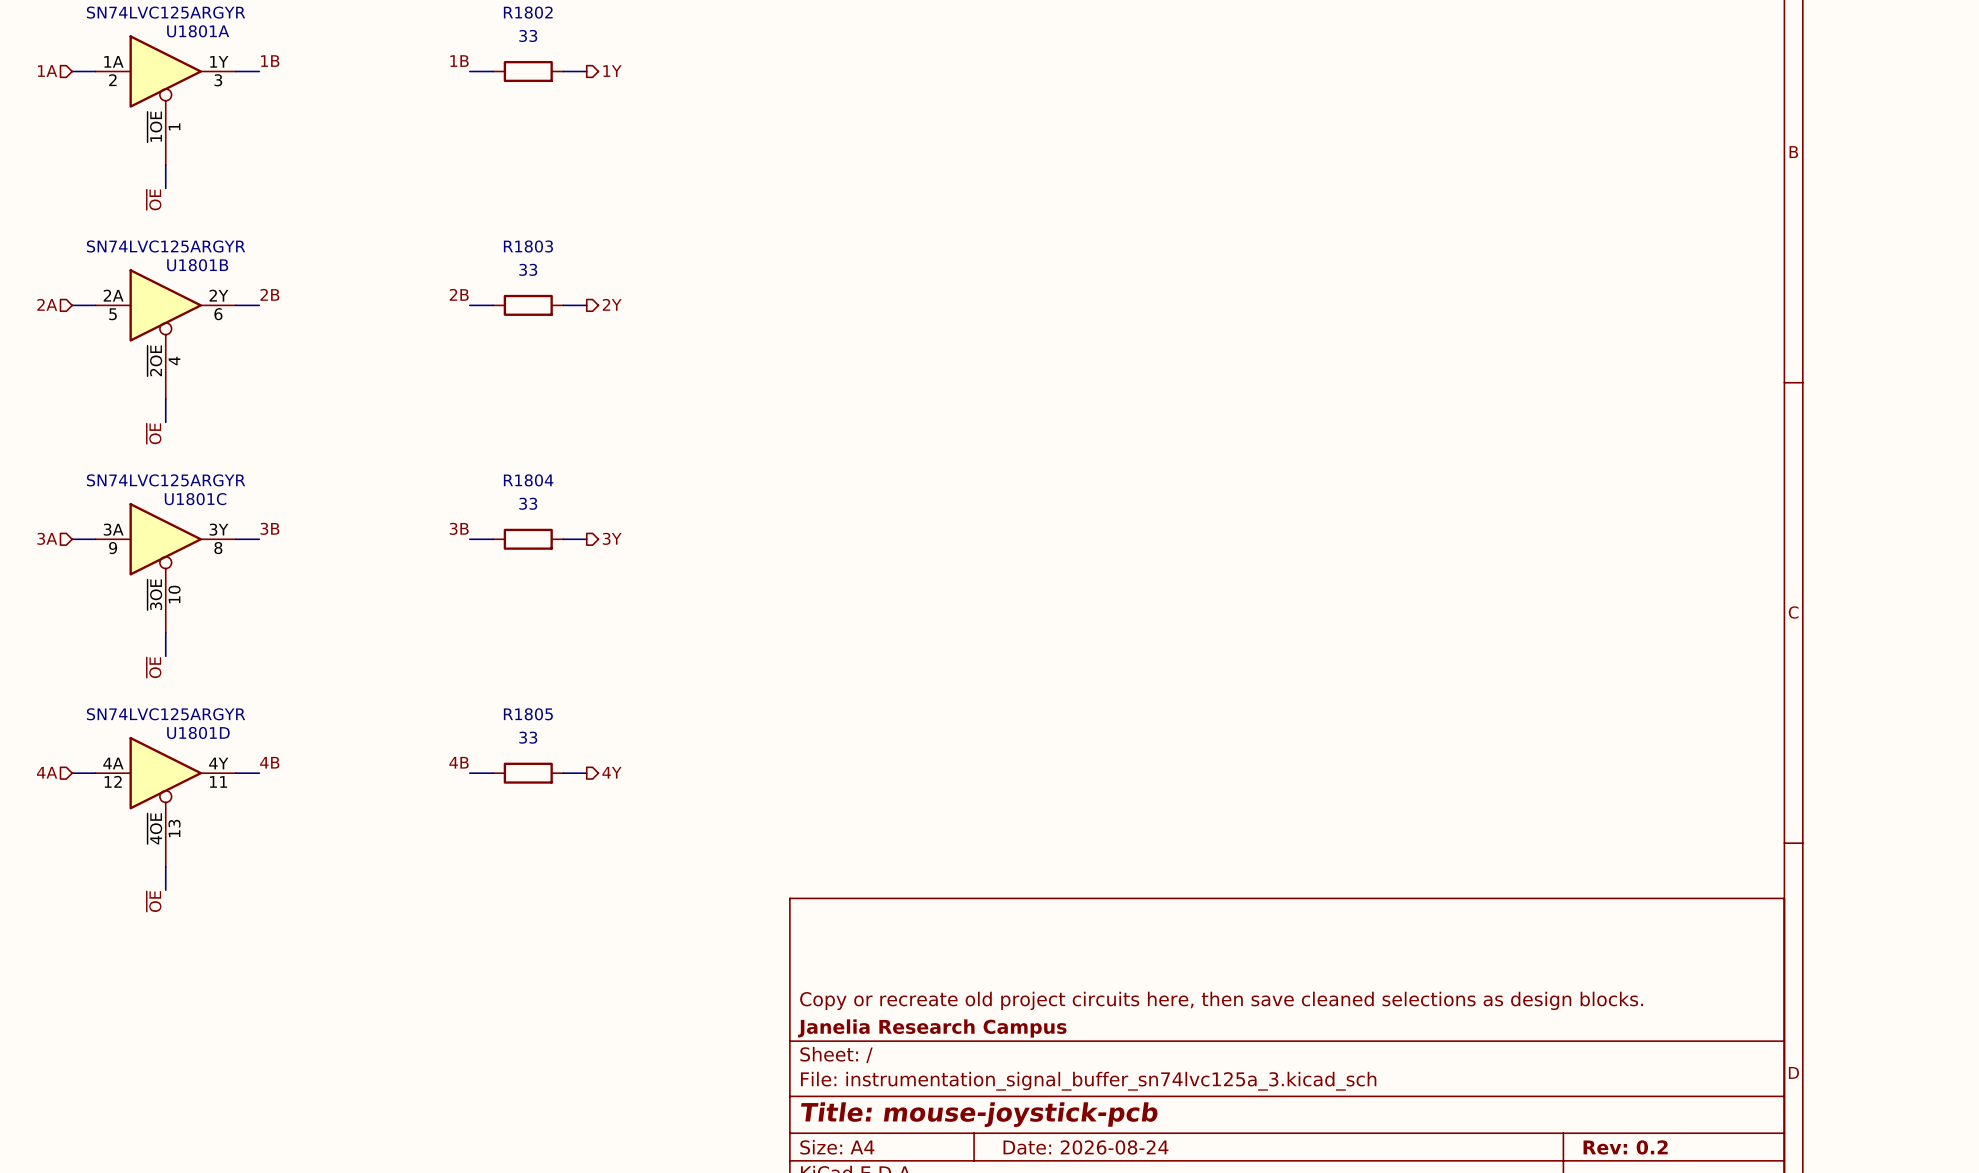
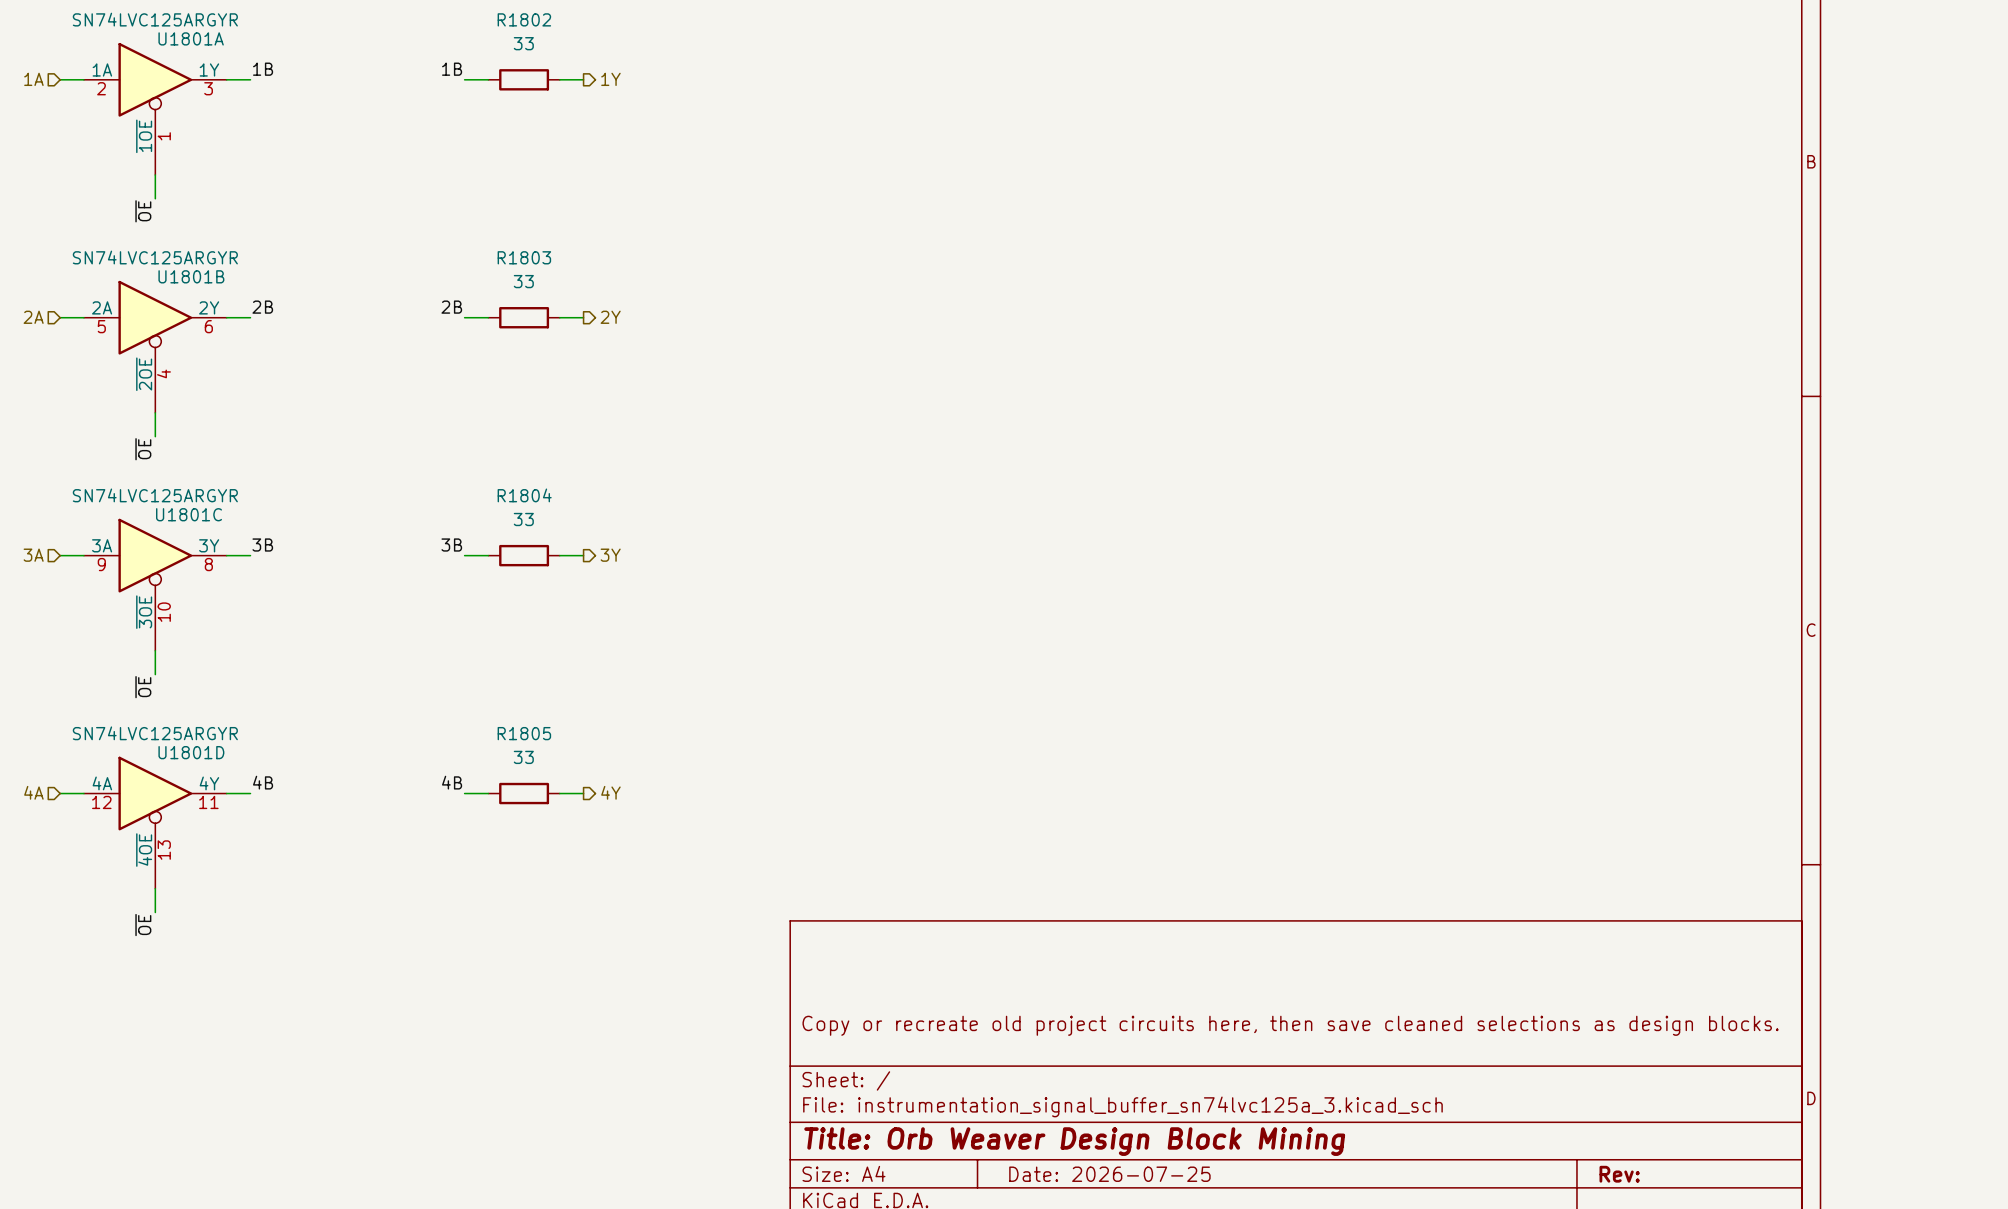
title block: Janelia Research Campus (932, 1028) -> none
title block: Title: mouse-joystick-pcb (979, 1114) -> Title: Orb Weaver Design Block Mining (1074, 1141)
title block: Date: 2026-08-24 (1085, 1147) -> Date: 2026-07-25 (1109, 1174)
title block: Rev: 0.2 (1625, 1147) -> Rev: (1619, 1174)

